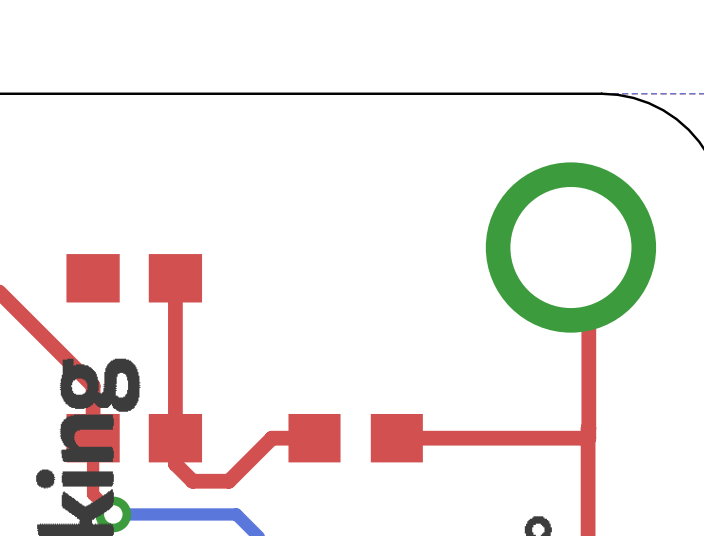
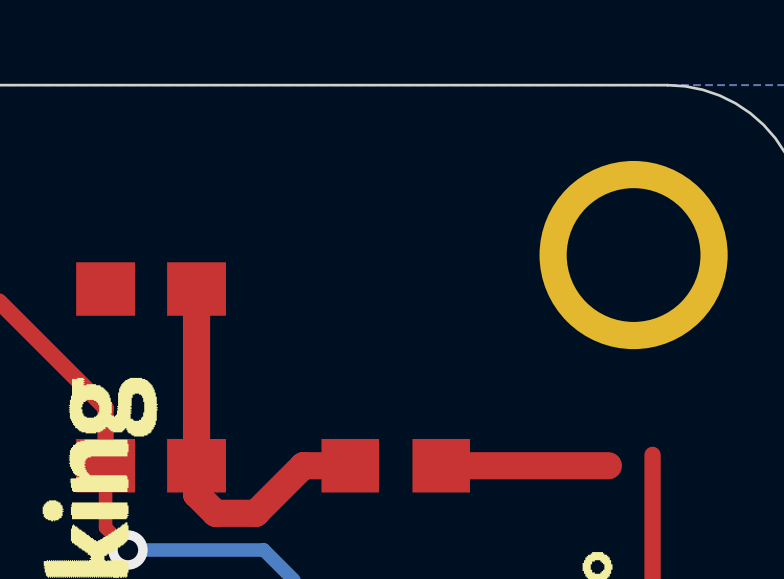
top track: (570, 247) (588, 265) (588, 438) (548, 438) -> none
top track width: thin (175, 278) (175, 464) (192, 481) (228, 481) (272, 438) (314, 438) -> thick (196, 289) (196, 494) (215, 513) (255, 513) (303, 465) (350, 465)
top track width: thin (548, 438) (396, 438) -> thick (608, 465) (441, 465)

